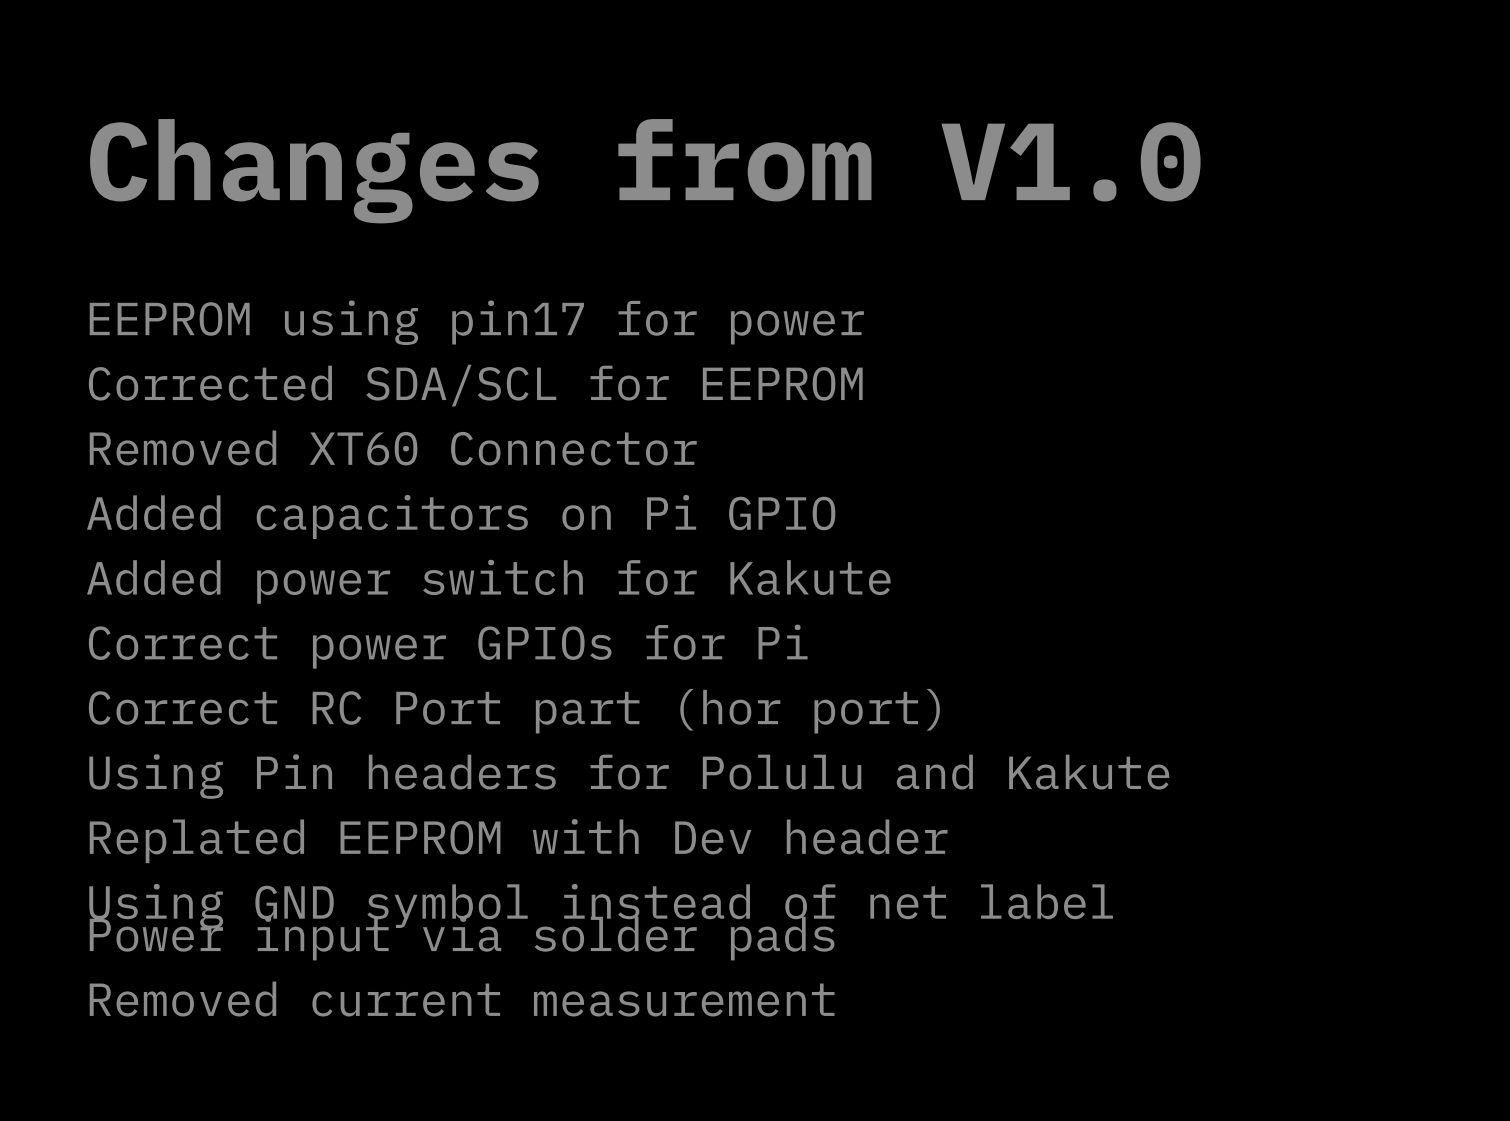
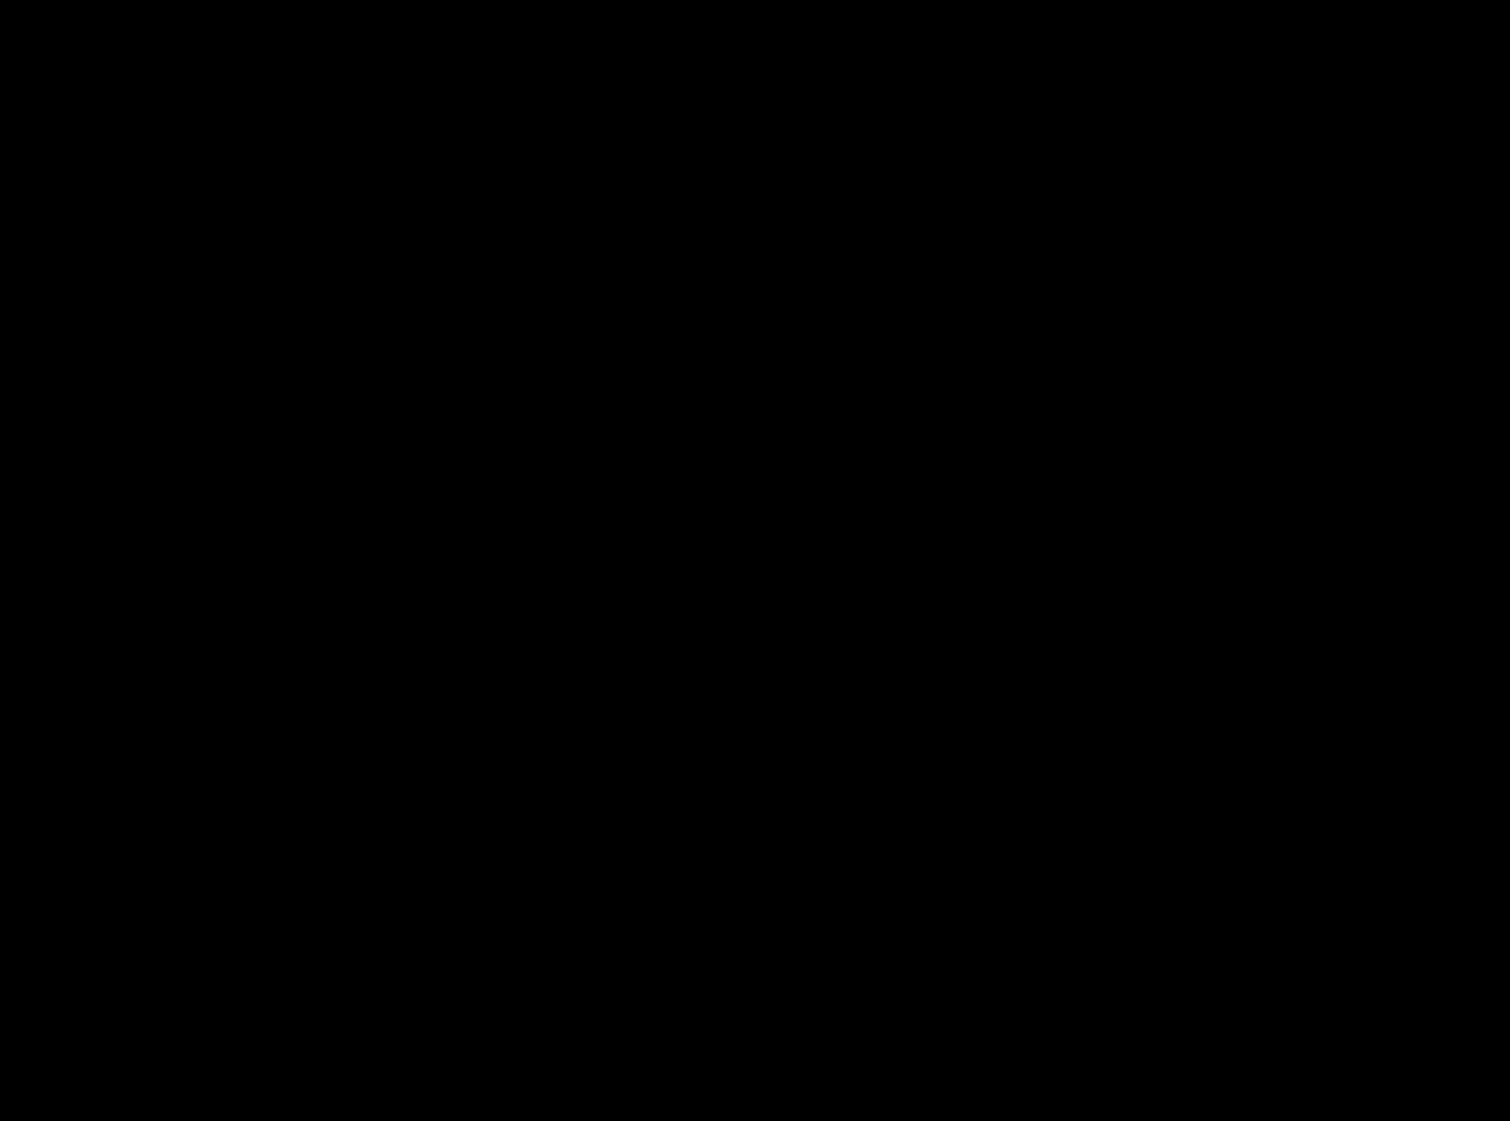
text: Changes from V1.0 (645, 171) -> none
text: EEPROM using pin17 for power (476, 322) -> none
text: Corrected SDA/SCL for EEPROM (475, 385) -> none
text: Removed XT60 Connector (393, 447) -> none
text: Added capacitors on Pi GPIO (461, 516) -> none
text: Added power switch for Kakute (488, 581) -> none
text: Correct power GPIOs for Pi (448, 646) -> none
text: Correct RC Port part (hor port) (514, 711) -> none
text: Using Pin headers for Polulu and Kakute (629, 776) -> none
text: Replated EEPROM with Dev header (518, 841) -> none
text: Using GND symbol instead of net label (601, 906) -> none
text: Power input via solder pads (462, 938) -> none
text: Removed current measurement (462, 999) -> none

